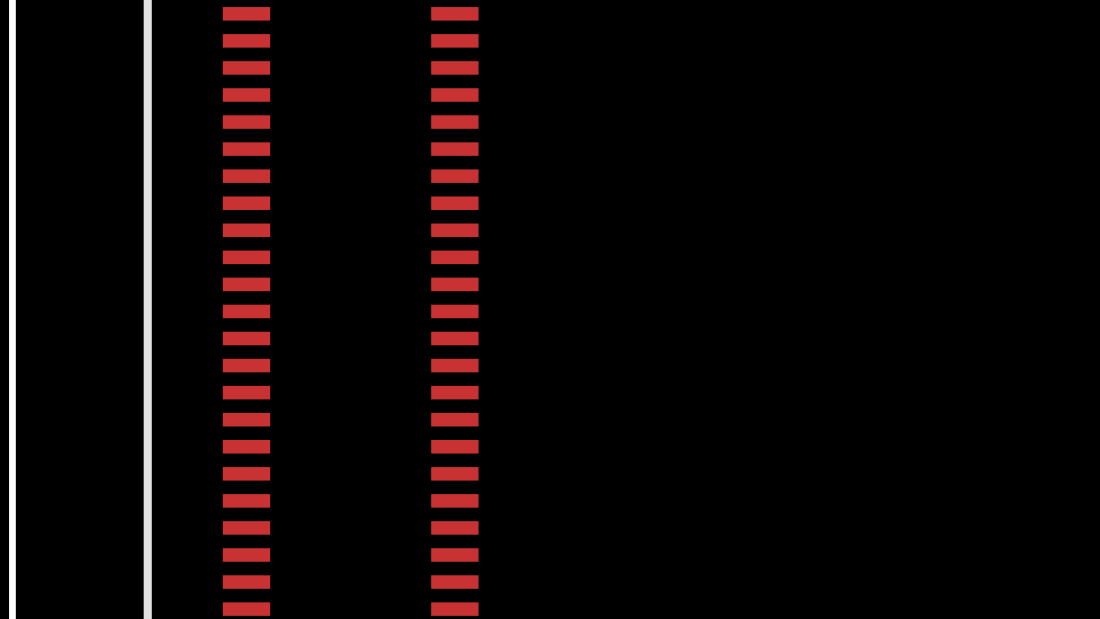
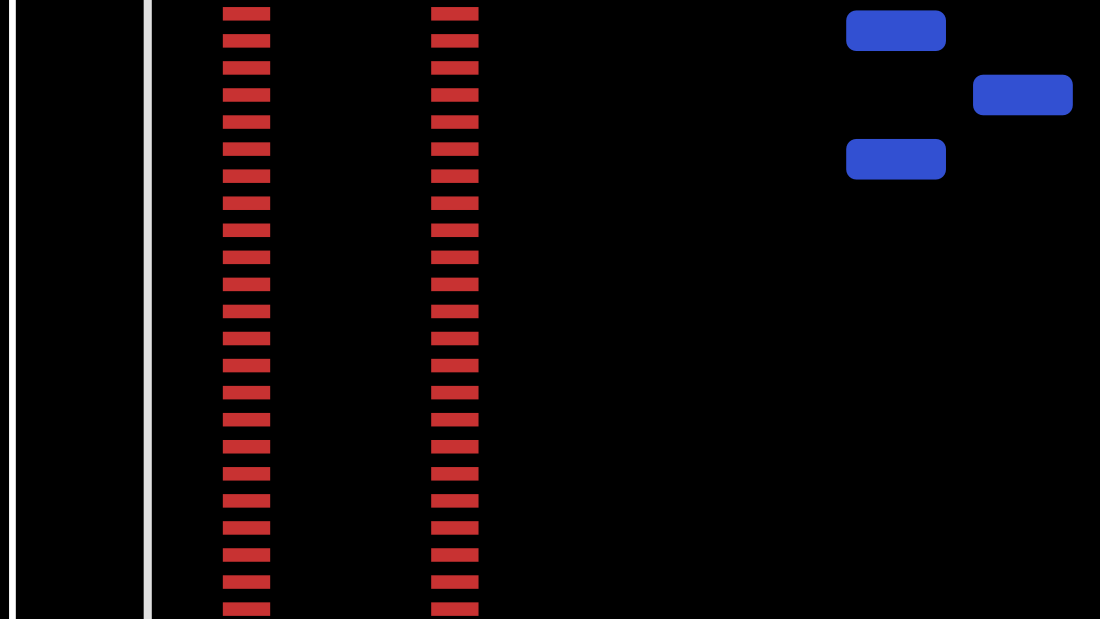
part: none -> (959, 94)

